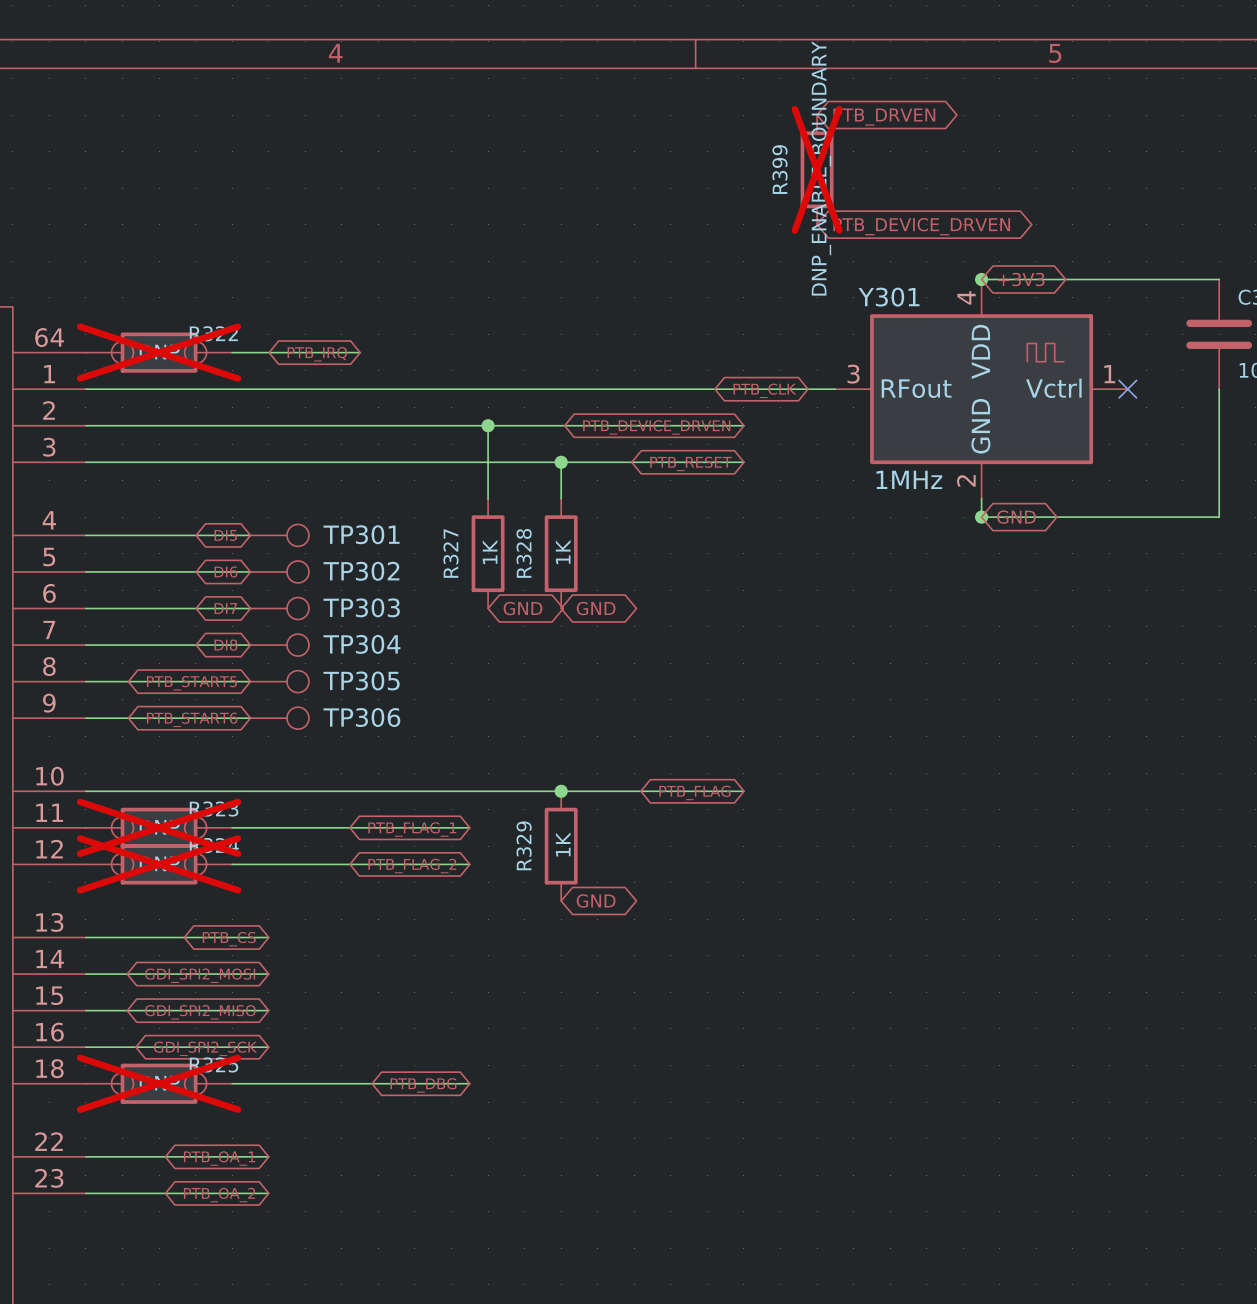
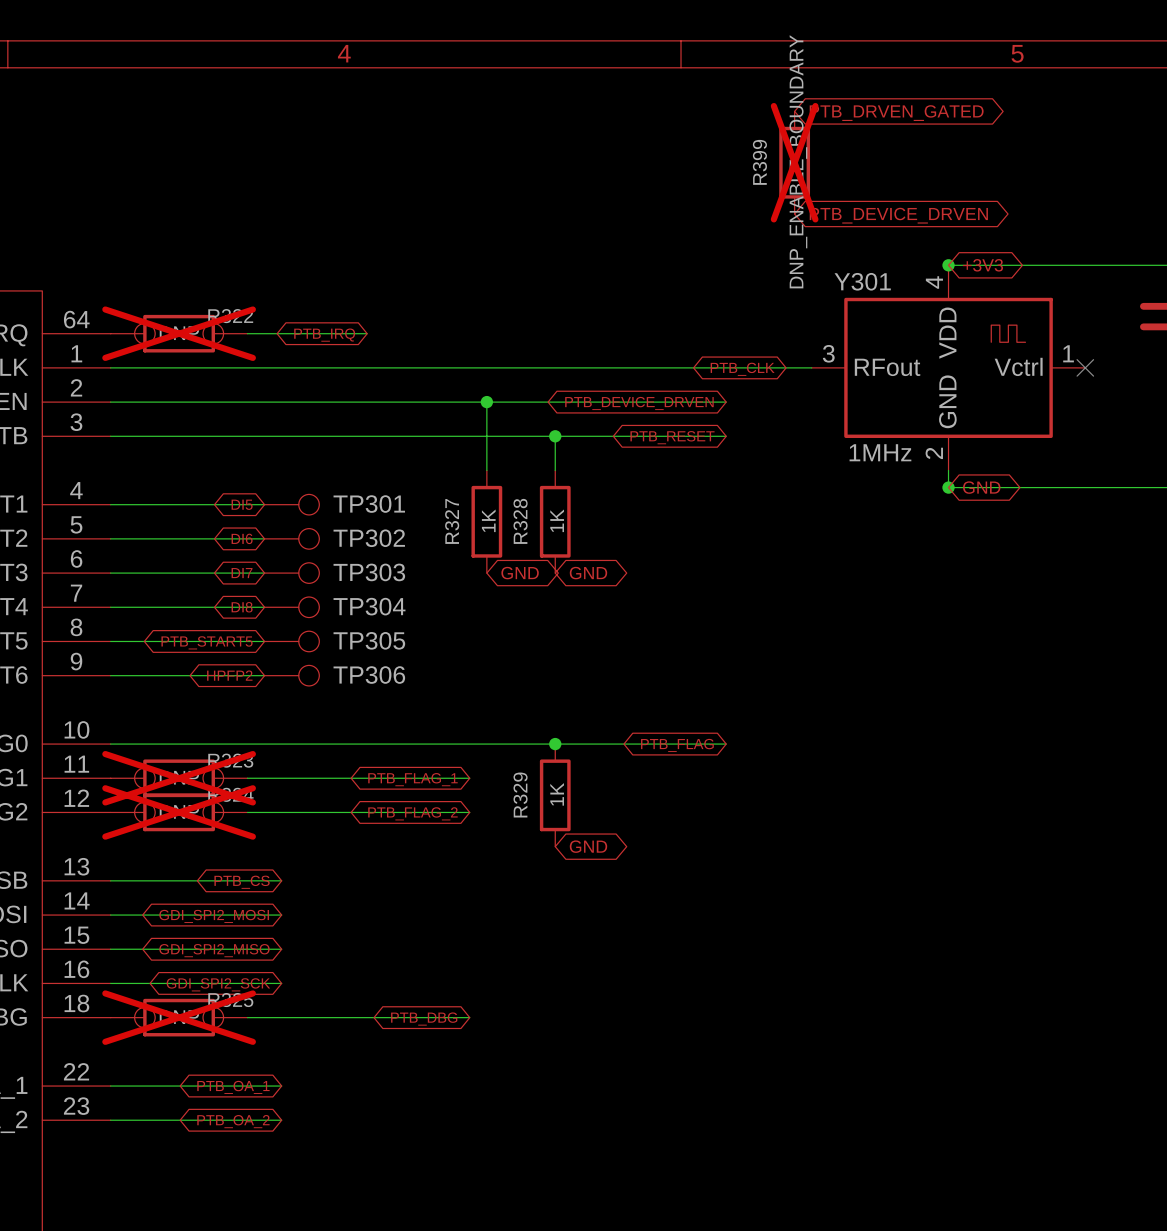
global label: PTB_DRVEN (884, 117) -> PTB_DRVEN_GATED (896, 113)
global label: PTB_START6 (192, 719) -> HPFP2 (229, 675)

